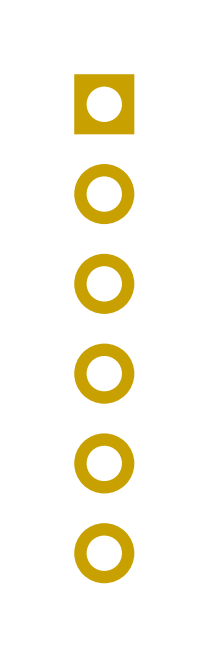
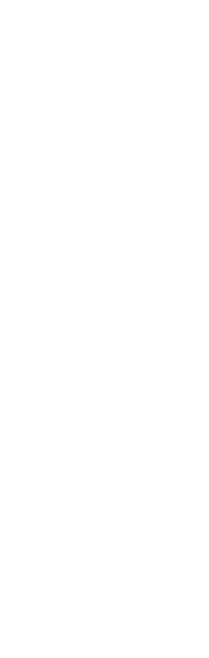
part: (104, 328) -> none

